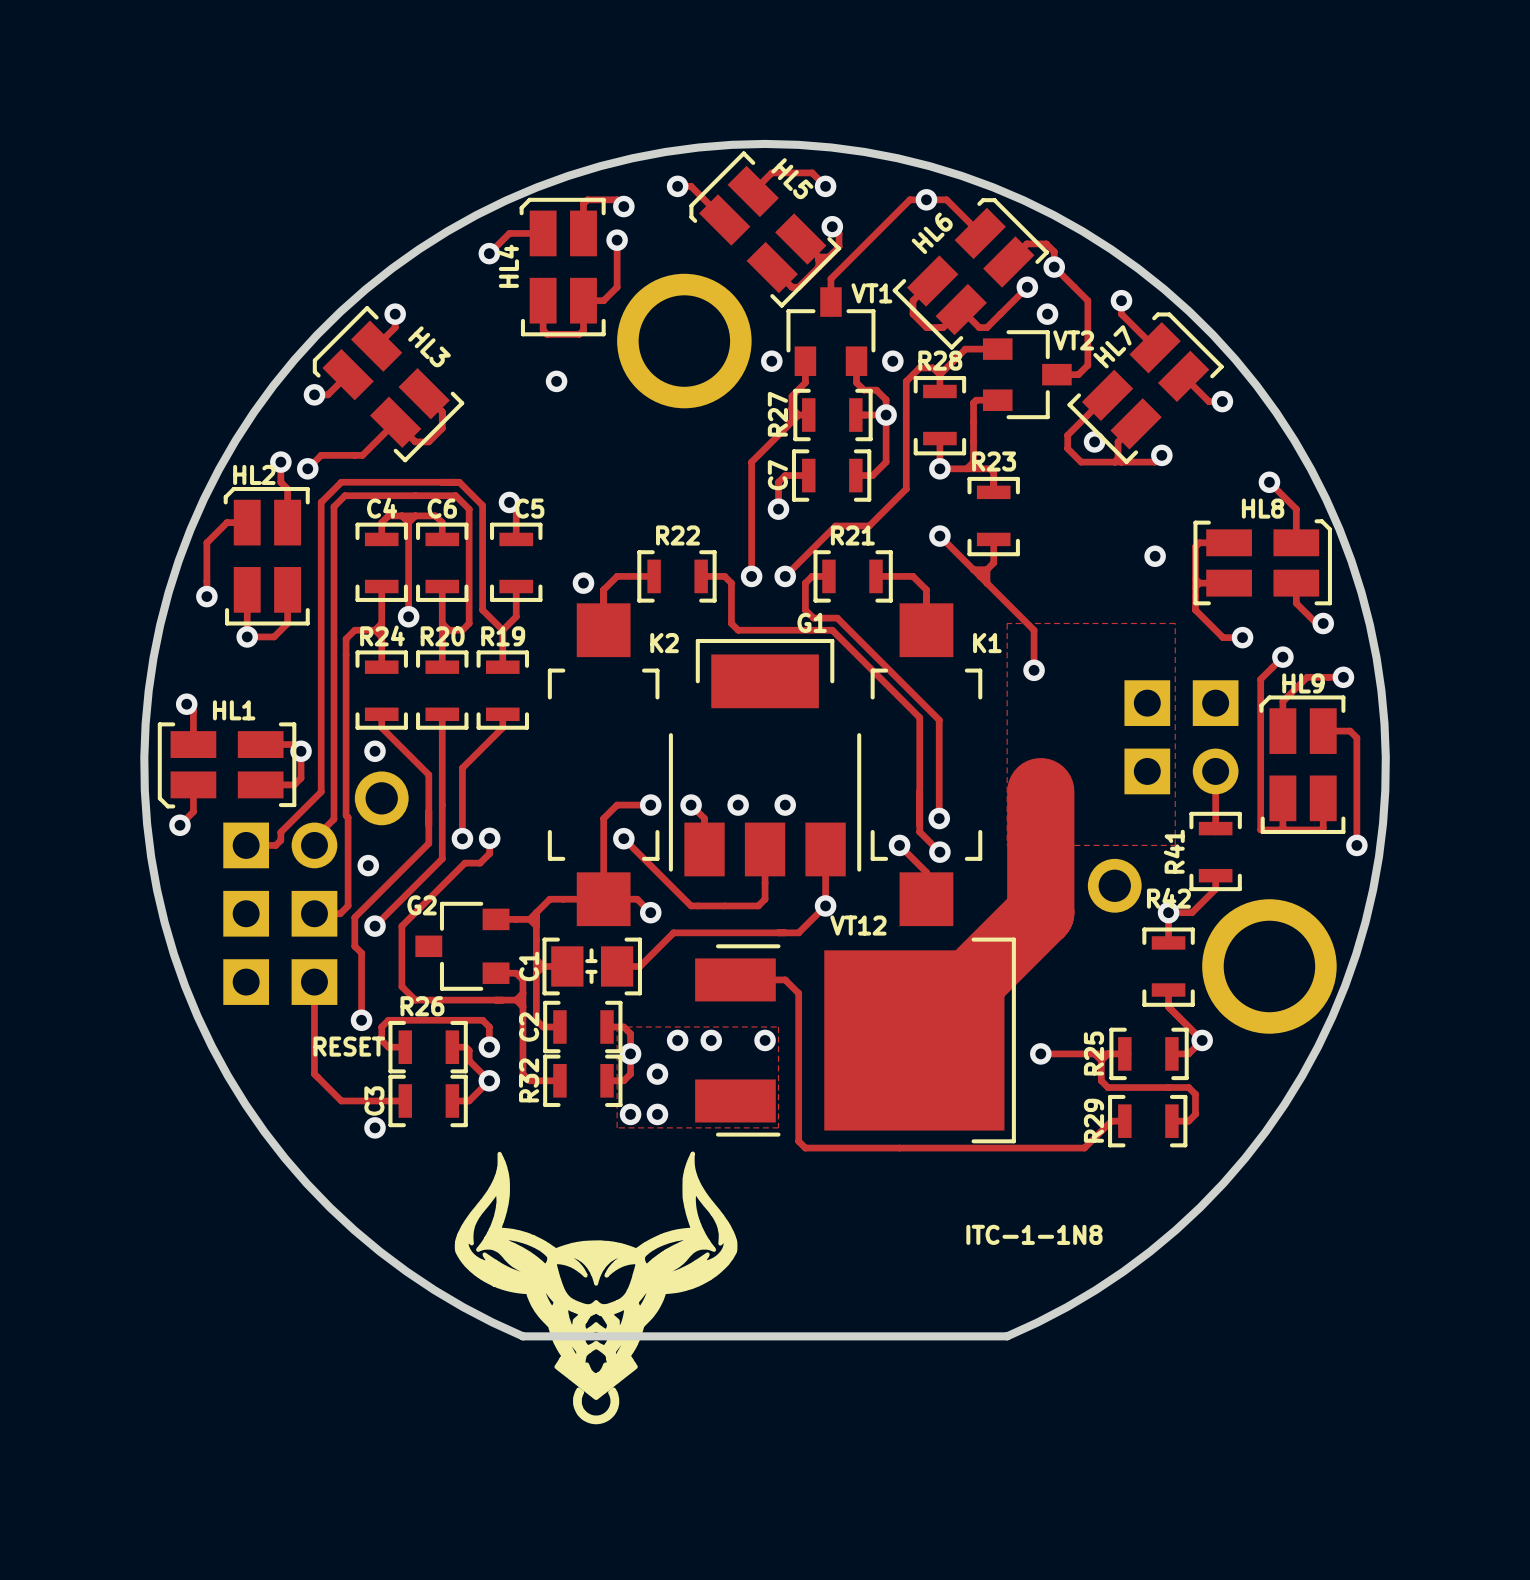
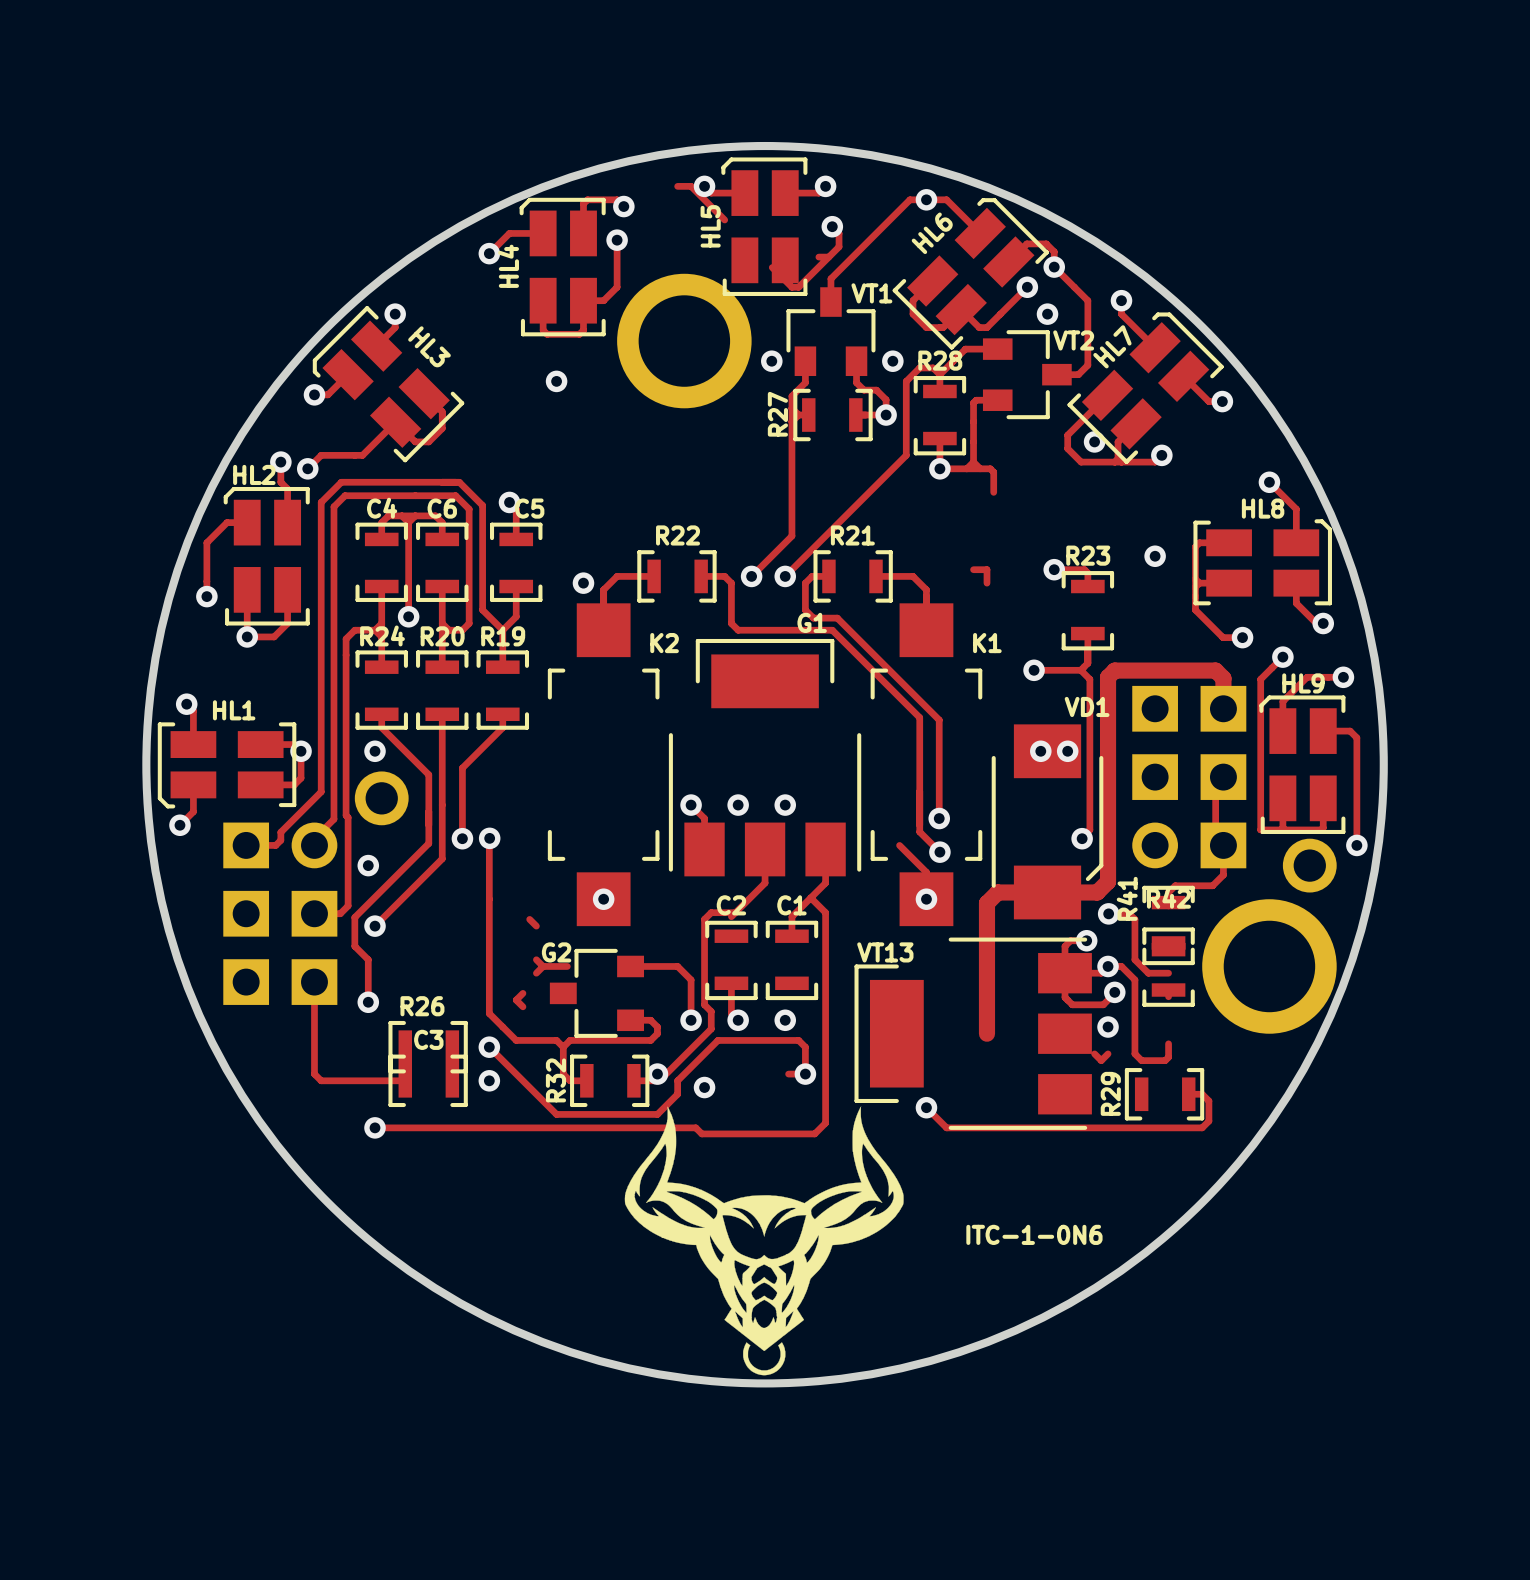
round board edge: none -> [142, 141, 1388, 1388]
HL5 name position: HL5 (792, 178) -> HL5 (710, 226)
via position: (677, 186) -> (704, 186)
track: none -> (704, 186) (711, 193) (744, 193)
track: (825, 186) (812, 172) (771, 172) (753, 191) -> (825, 186) (818, 193) (785, 193)
HL5 rotation: 0° (765, 229) -> 45° clockwise (764, 226)
track: (886, 415) (886, 462) (872, 475) (855, 475) -> none
track: (791, 421) (751, 462) (751, 576) -> (791, 421) (791, 536) (751, 576)
track: (906, 455) (906, 488) (869, 525) (835, 525) -> (906, 455) (835, 525)
track: (808, 475) (785, 475) (778, 482) (778, 509) -> none
C7: (831, 475) -> none
via: (778, 509) -> none
R23 position: (993, 516) -> (1087, 610)
track: (939, 536) (1034, 630) (1034, 670) -> (1080, 670) (1034, 670)
via: (939, 536) -> none
track: (993, 539) (993, 562) (980, 576) -> none
track: none -> (1054, 569) (1084, 569) (1087, 573) (1087, 586)
via: none -> (1054, 569)
zone outline: (1007, 623) (1175, 623) (1175, 845) (1007, 845) (1007, 623) -> none
track: none -> (1087, 633) (1087, 663) (1080, 670)
track: none -> (1080, 670) (1089, 679) (1089, 829) (1082, 838)
track: none -> (1223, 708) (1223, 678) (1215, 670) (1114, 670) (1108, 677) (1108, 881) (1097, 892) (997, 892) (986, 903) (986, 1033)
part: (1181, 737) -> none
via: none -> (1040, 751)
via: none -> (1067, 751)
part: none -> (1189, 777)
track: (1040, 791) (1040, 912) (914, 1040) -> none
track: (650, 805) (617, 805) (603, 818) (603, 899) -> none
via: (650, 805) -> none
VD1: none -> (1047, 821)
track: (489, 838) (489, 853) (480, 863) (464, 863) (401, 926) (401, 986) (415, 1000) (516, 1000) -> (489, 838) (489, 1013) (516, 1040) (556, 1040) (563, 1047)
track: (623, 838) (691, 905) (758, 905) (765, 899) (765, 883) -> (731, 916) (765, 883)
via: (623, 838) -> none
via: none -> (1082, 838)
via: (899, 845) -> none
track: none -> (1223, 845) (1223, 875) (1212, 885) (1175, 885) (1168, 892) (1168, 905)
R41 name position: R41 (1174, 851) -> R41 (1127, 898)
R41 position: (1215, 851) -> (1168, 925)
track: (1215, 875) (1215, 889) (1192, 912) (1161, 912) (1168, 919) -> none
track: (825, 883) (825, 905) (798, 932) (673, 932) (639, 966) -> (825, 883) (791, 916) (791, 932)
part position: (1114, 885) -> (1309, 865)
track: none -> (810, 897) (825, 912) (825, 1123) (814, 1133) (701, 1133) (695, 1127) (375, 1127)
via: none -> (603, 899)
via: none -> (926, 899)
via: (825, 905) -> none
track: (536, 912) (536, 1020) (543, 1027) (559, 1027) -> none
track: (650, 912) (637, 899) (549, 899) (529, 919) (496, 919) -> none
via: (650, 912) -> none
track: none -> (735, 912) (711, 912) (704, 919) (704, 1004) (711, 1011) (711, 1028) (659, 1080) (633, 1080)
via: (1168, 912) -> none
track: none -> (1108, 913) (1129, 913) (1134, 919) (1134, 959) (1148, 973) (1168, 973)
via: none -> (1108, 913)
track: (1168, 919) (1168, 939) -> none
C1 footprint: [542, 937, 642, 996] -> [765, 920, 819, 1001]
track: none -> (1086, 940) (1070, 940) (1065, 946) (1065, 997) (1072, 1004) (1103, 1004) (1114, 992)
via: none -> (1086, 940)
G2 position: (462, 946) -> (596, 993)
track: (361, 953) (361, 1020) -> (361, 953) (368, 959) (368, 1002)
C1 name position: C1 (529, 966) -> C1 (791, 905)
track: none -> (639, 966) (677, 966) (691, 979) (691, 1020)
via: none -> (1108, 966)
track: (496, 973) (516, 973) (522, 979) (522, 1074) (529, 1080) (559, 1080) -> none
track: none -> (1065, 973) (1101, 973) (1108, 966) (1121, 966) (1134, 979) (1134, 1053) (1141, 1060) (1165, 1060) (1168, 1057) (1168, 1043)
track: (731, 979) (785, 979) (798, 993) (798, 1141) (805, 1148) (1084, 1148) (1111, 1121) (1124, 1121) -> none
track: none -> (731, 983) (731, 1013) (738, 1020)
via: none -> (1114, 992)
track: (1168, 996) (1168, 1006) (1202, 1040) (1188, 1053) (1175, 1053) -> none
via position: (361, 1020) -> (368, 1002)
track: none -> (630, 1020) (650, 1020) (657, 1027) (657, 1033) (650, 1040) (570, 1040) (563, 1047)
via: none -> (691, 1020)
via: none -> (738, 1020)
via: none -> (785, 1020)
C2 name position: C2 (529, 1027) -> C2 (731, 905)
C2 rotation: 0° (582, 1027) -> 90° counterclockwise (731, 960)
C2 position: (582, 1027) -> (731, 960)
track: (607, 1027) (623, 1027) (630, 1033) (630, 1074) (623, 1080) (607, 1080) -> none
zone outline: (617, 1027) (617, 1127) (778, 1127) (778, 1027) (617, 1027) -> none
via: none -> (1108, 1027)
VT13: none -> (973, 1033)
via: (677, 1040) -> none
via: (711, 1040) -> none
via: (765, 1040) -> none
VT12: (855, 1040) -> none
via: (1202, 1040) -> none
text: RESET (349, 1046) -> none
track: (401, 1047) (388, 1047) (381, 1040) (381, 1027) (388, 1020) (482, 1020) (489, 1027) (489, 1047) -> (788, 1074) (798, 1074) (805, 1080) (805, 1047) (798, 1040) (717, 1040) (677, 1080) (677, 1094) (657, 1114) (556, 1114) (489, 1047)
track: (452, 1047) (465, 1047) (469, 1050) (469, 1060) (489, 1080) (469, 1100) (452, 1100) -> none
track: none -> (563, 1047) (563, 1074) (570, 1080) (586, 1080)
via: (630, 1053) -> none
track: (1040, 1053) (1128, 1053) -> none
via: (1040, 1053) -> none
R25: (1149, 1053) -> none
track: (1101, 1060) (1101, 1080) (1108, 1087) (1188, 1087) (1195, 1094) (1195, 1114) (1188, 1121) (1171, 1121) -> none
via: none -> (805, 1074)
track: (321, 1080) (341, 1100) (405, 1100) -> (321, 1080) (405, 1080)
R32 position: (582, 1080) -> (609, 1080)
via: none -> (704, 1087)
track: none -> (1188, 1094) (1202, 1094) (1208, 1100) (1208, 1121) (1202, 1127) (946, 1127) (926, 1107)
C3 name rotation: 0° (374, 1100) -> 90° clockwise (428, 1039)
C3 name position: C3 (374, 1100) -> C3 (428, 1039)
C3 position: (428, 1100) -> (428, 1080)
drawing: none -> [624, 1106, 904, 1376]
via: none -> (926, 1107)
via: (630, 1114) -> none
via: (657, 1114) -> none
R29 position: (1147, 1121) -> (1164, 1094)
drawing: [454, 1151, 738, 1425] -> none
text: ITC-1-1N8 (1034, 1234) -> ITC-1-0N6 (1034, 1234)
board edge: (522, 1336) (1007, 1336) (1067, 1307) (1123, 1271) (1175, 1230) (1223, 1183) (1245, 1158) (1284, 1104) (1318, 1046) (1345, 985) (1365, 922) (1373, 889) (1383, 823) (1385, 757) (1381, 690) (1369, 624) (1351, 560) (1339, 529) (1311, 469) (1276, 412) (1256, 385) (1213, 334) (1164, 289) (1111, 249) (1053, 215) (993, 187) (961, 175) (897, 158) (831, 147) (765, 143) (698, 147) (632, 158) (568, 175) (506, 200) (447, 231) (391, 268) (340, 311) (317, 335) (273, 385) (235, 440) (203, 499) (190, 529) (168, 592) (153, 657) (145, 723) (144, 790) (151, 856) (157, 889) (173, 954) (197, 1016) (227, 1076) (245, 1104) (284, 1158) (329, 1207) (379, 1251) (434, 1290) (463, 1307) (492, 1322) (523, 1336) -> none

